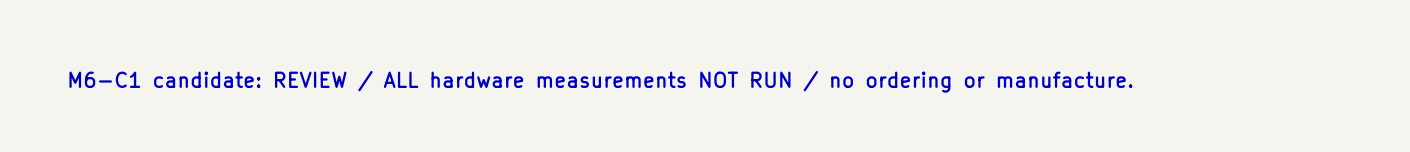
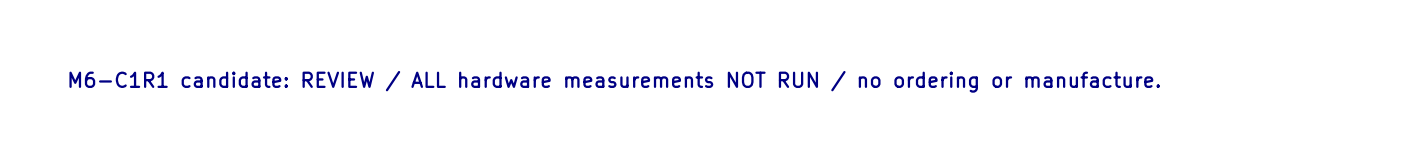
text: M6-C1 candidate: REVIEW / ALL hardware measurements NOT RUN / no ordering or manufacture. (600, 81) -> M6-C1R1 candidate: REVIEW / ALL hardware measurements NOT RUN / no ordering or manufacture. (614, 81)

